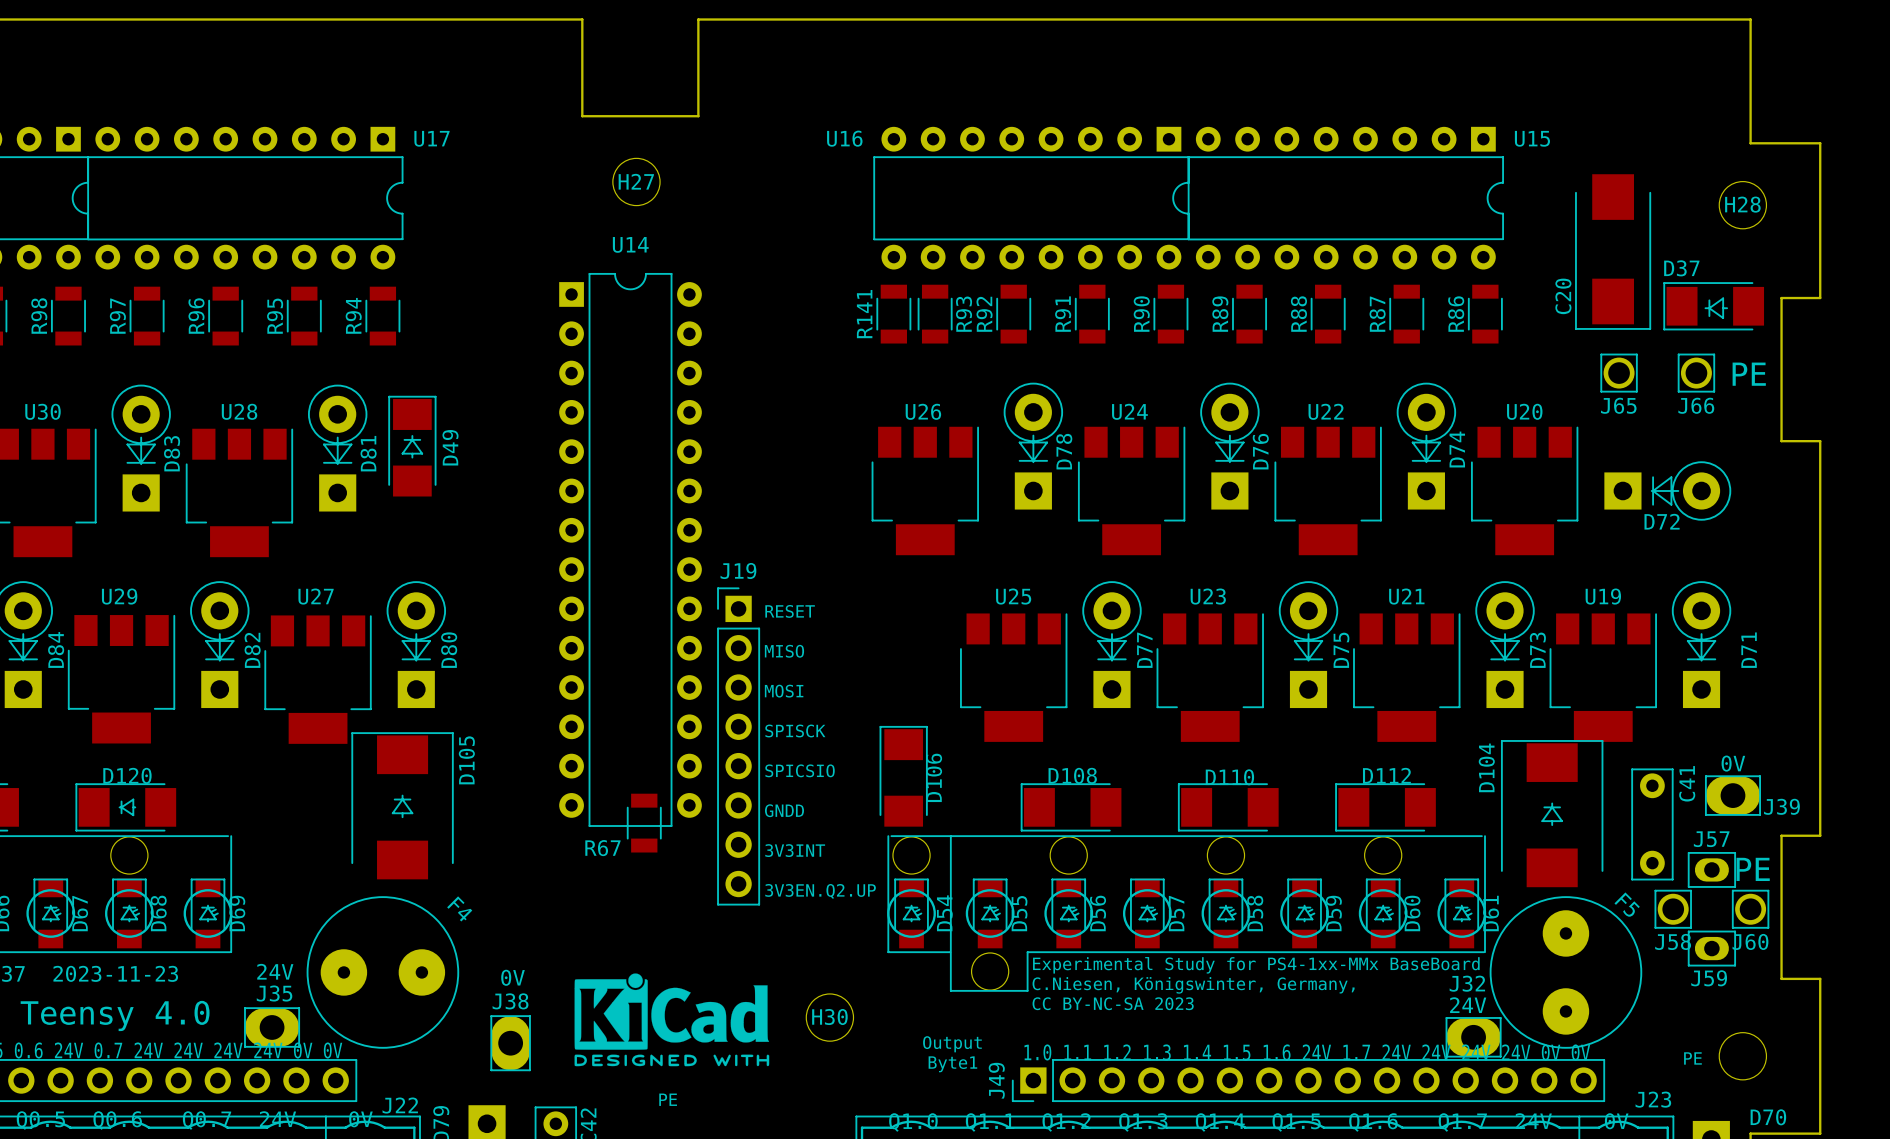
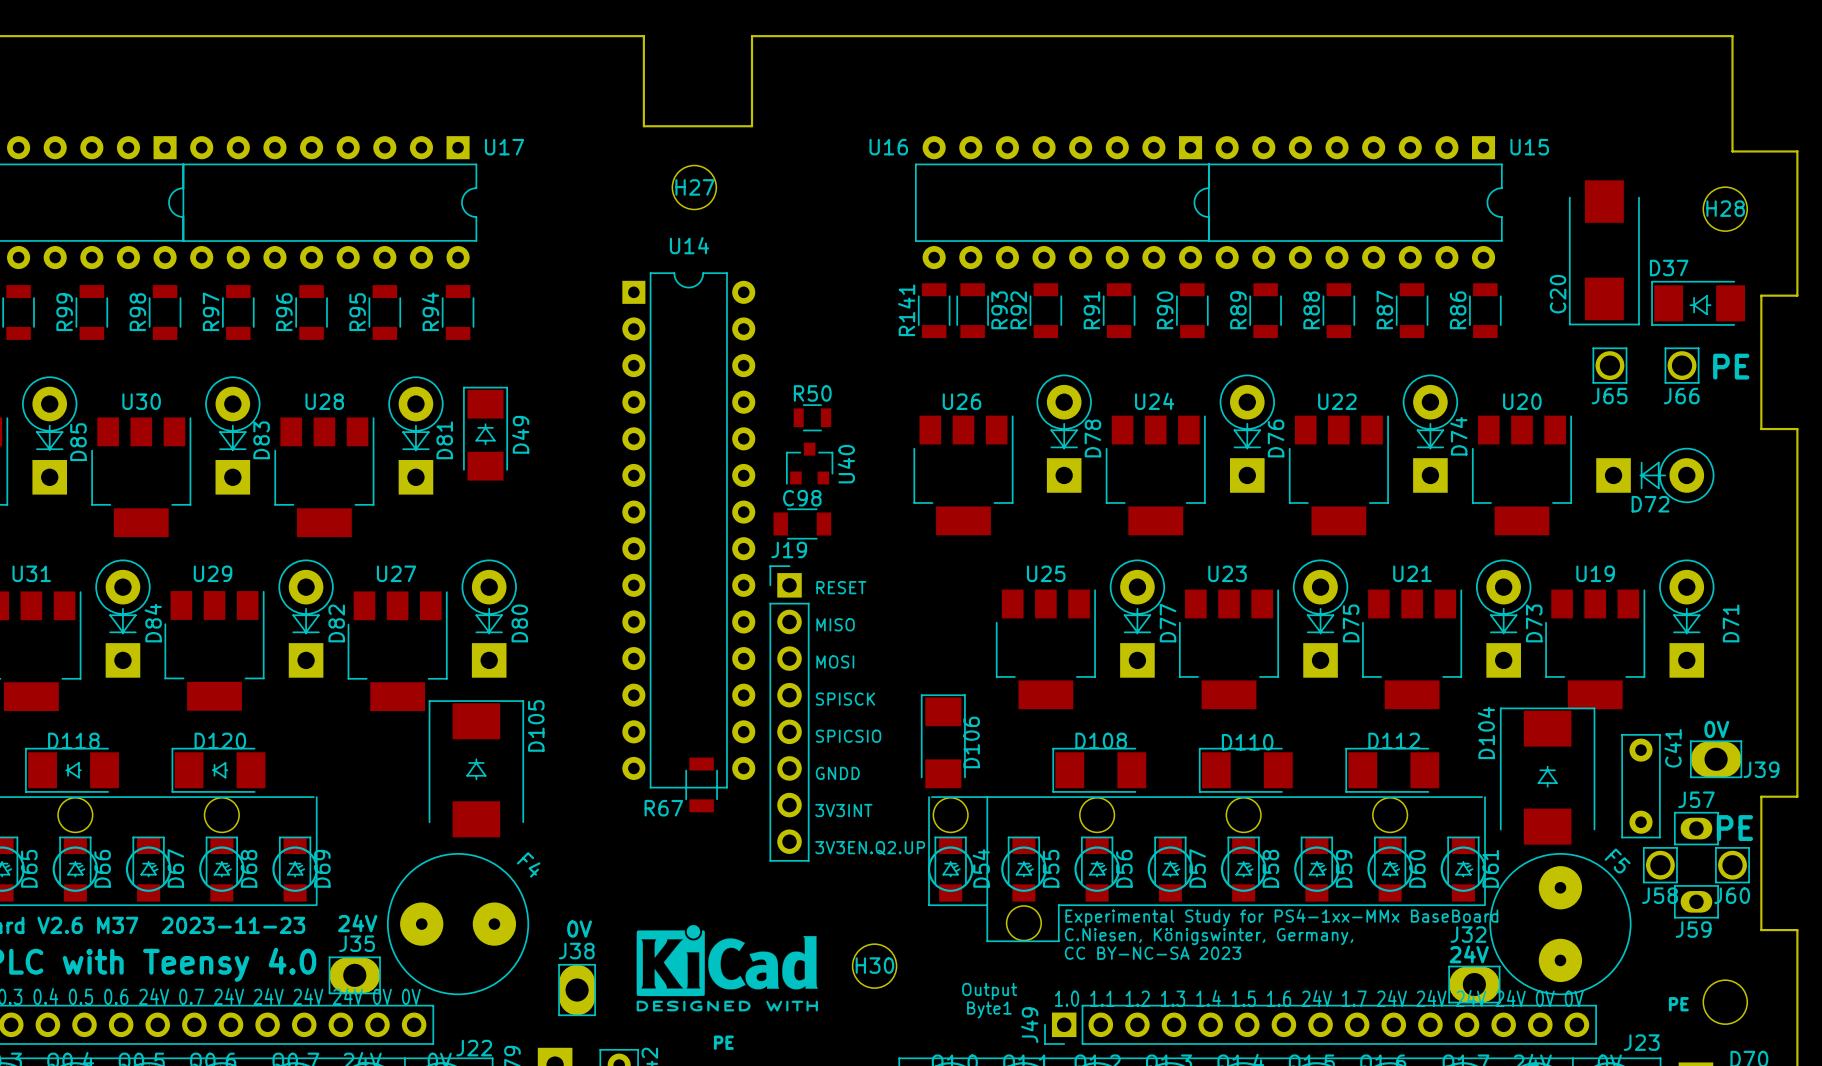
R50: none -> (812, 417)
U40: none -> (809, 463)
C98: none -> (802, 523)

